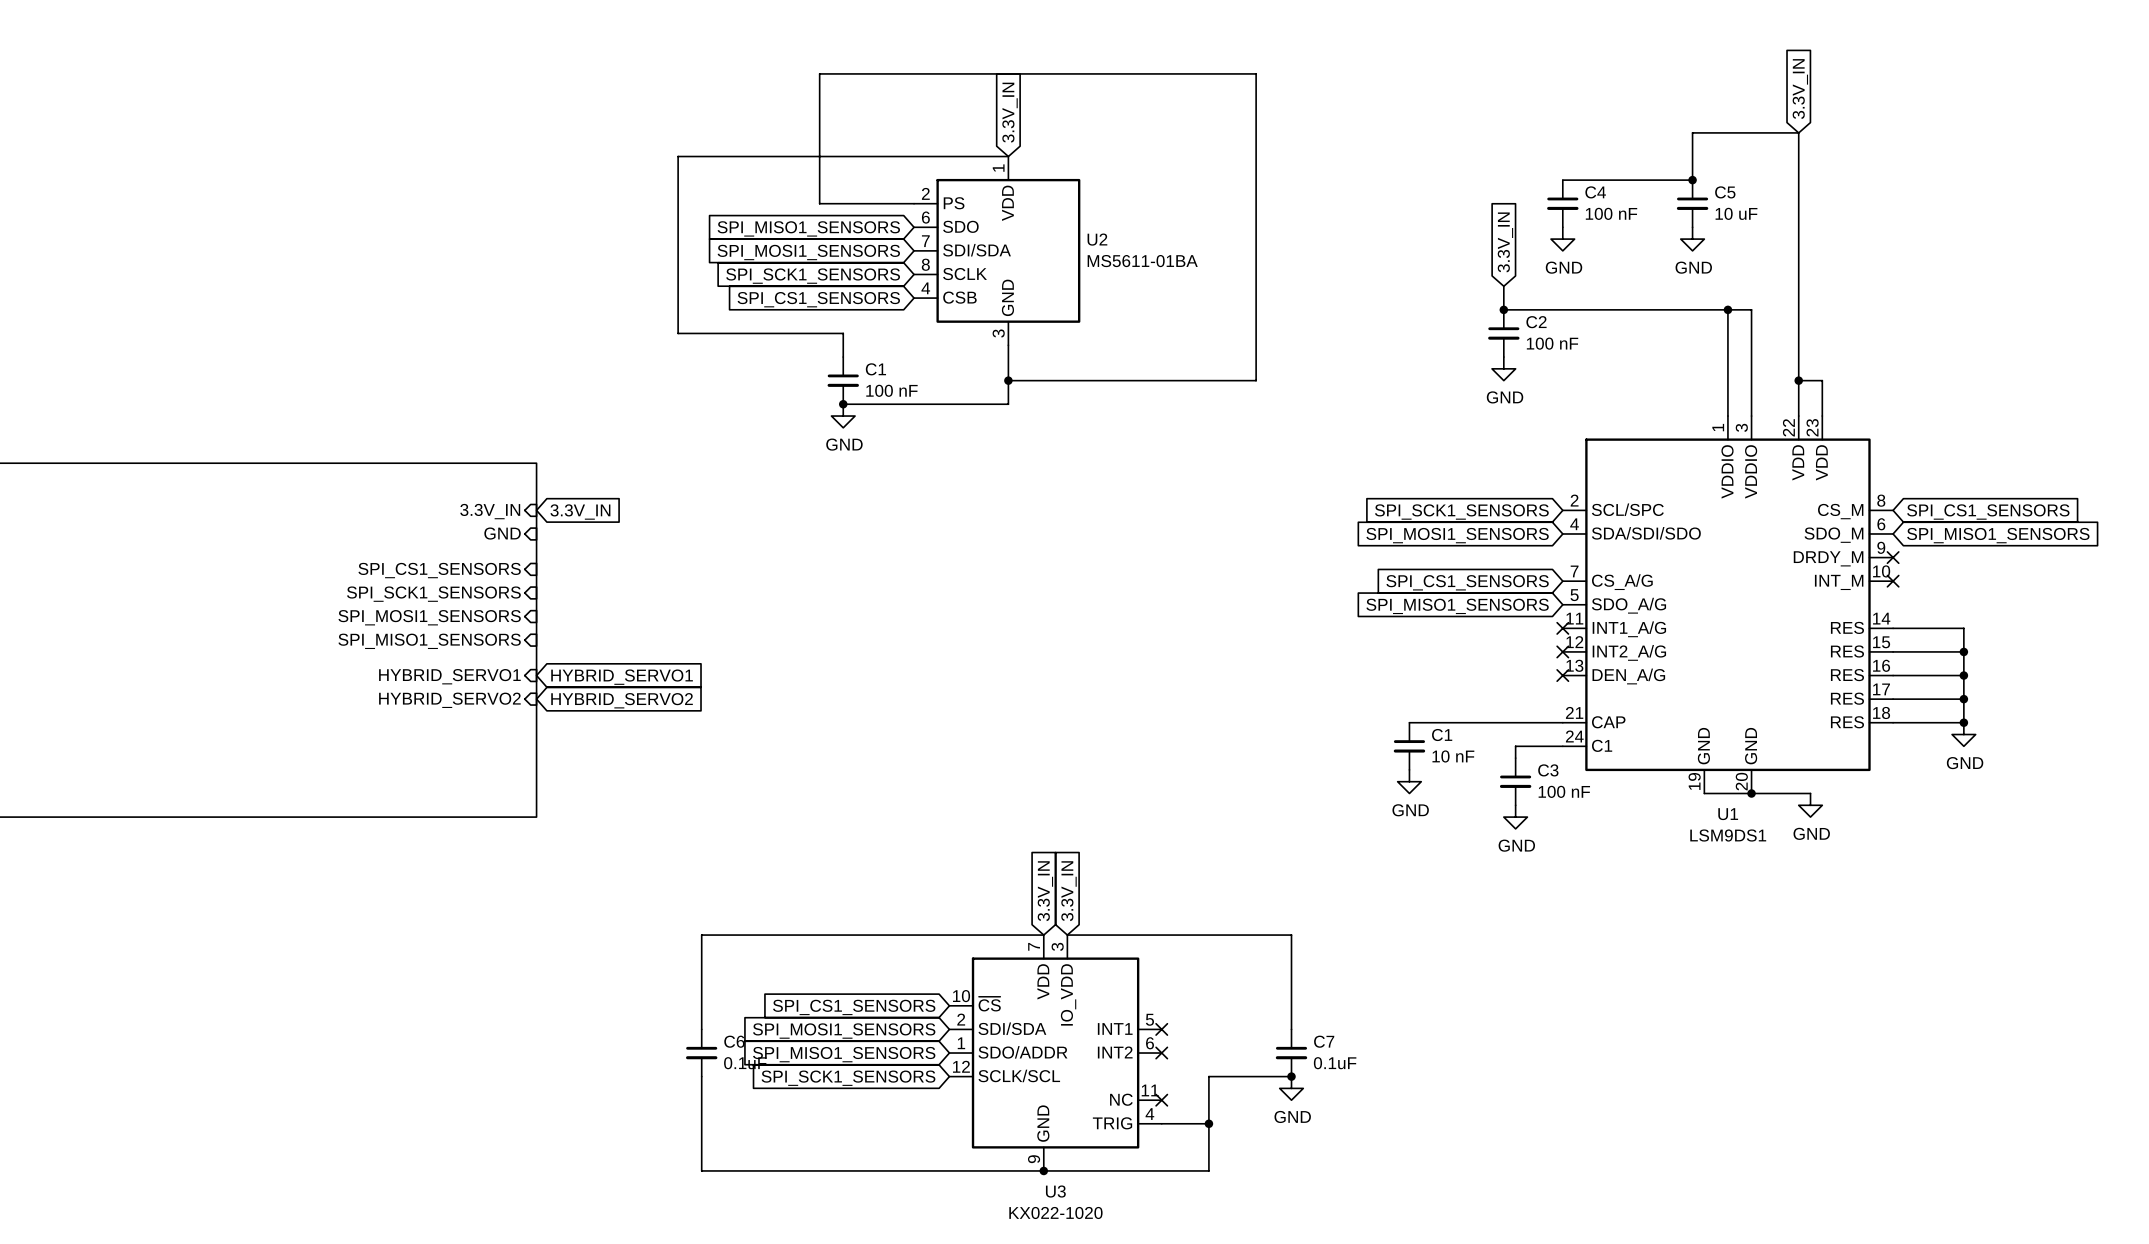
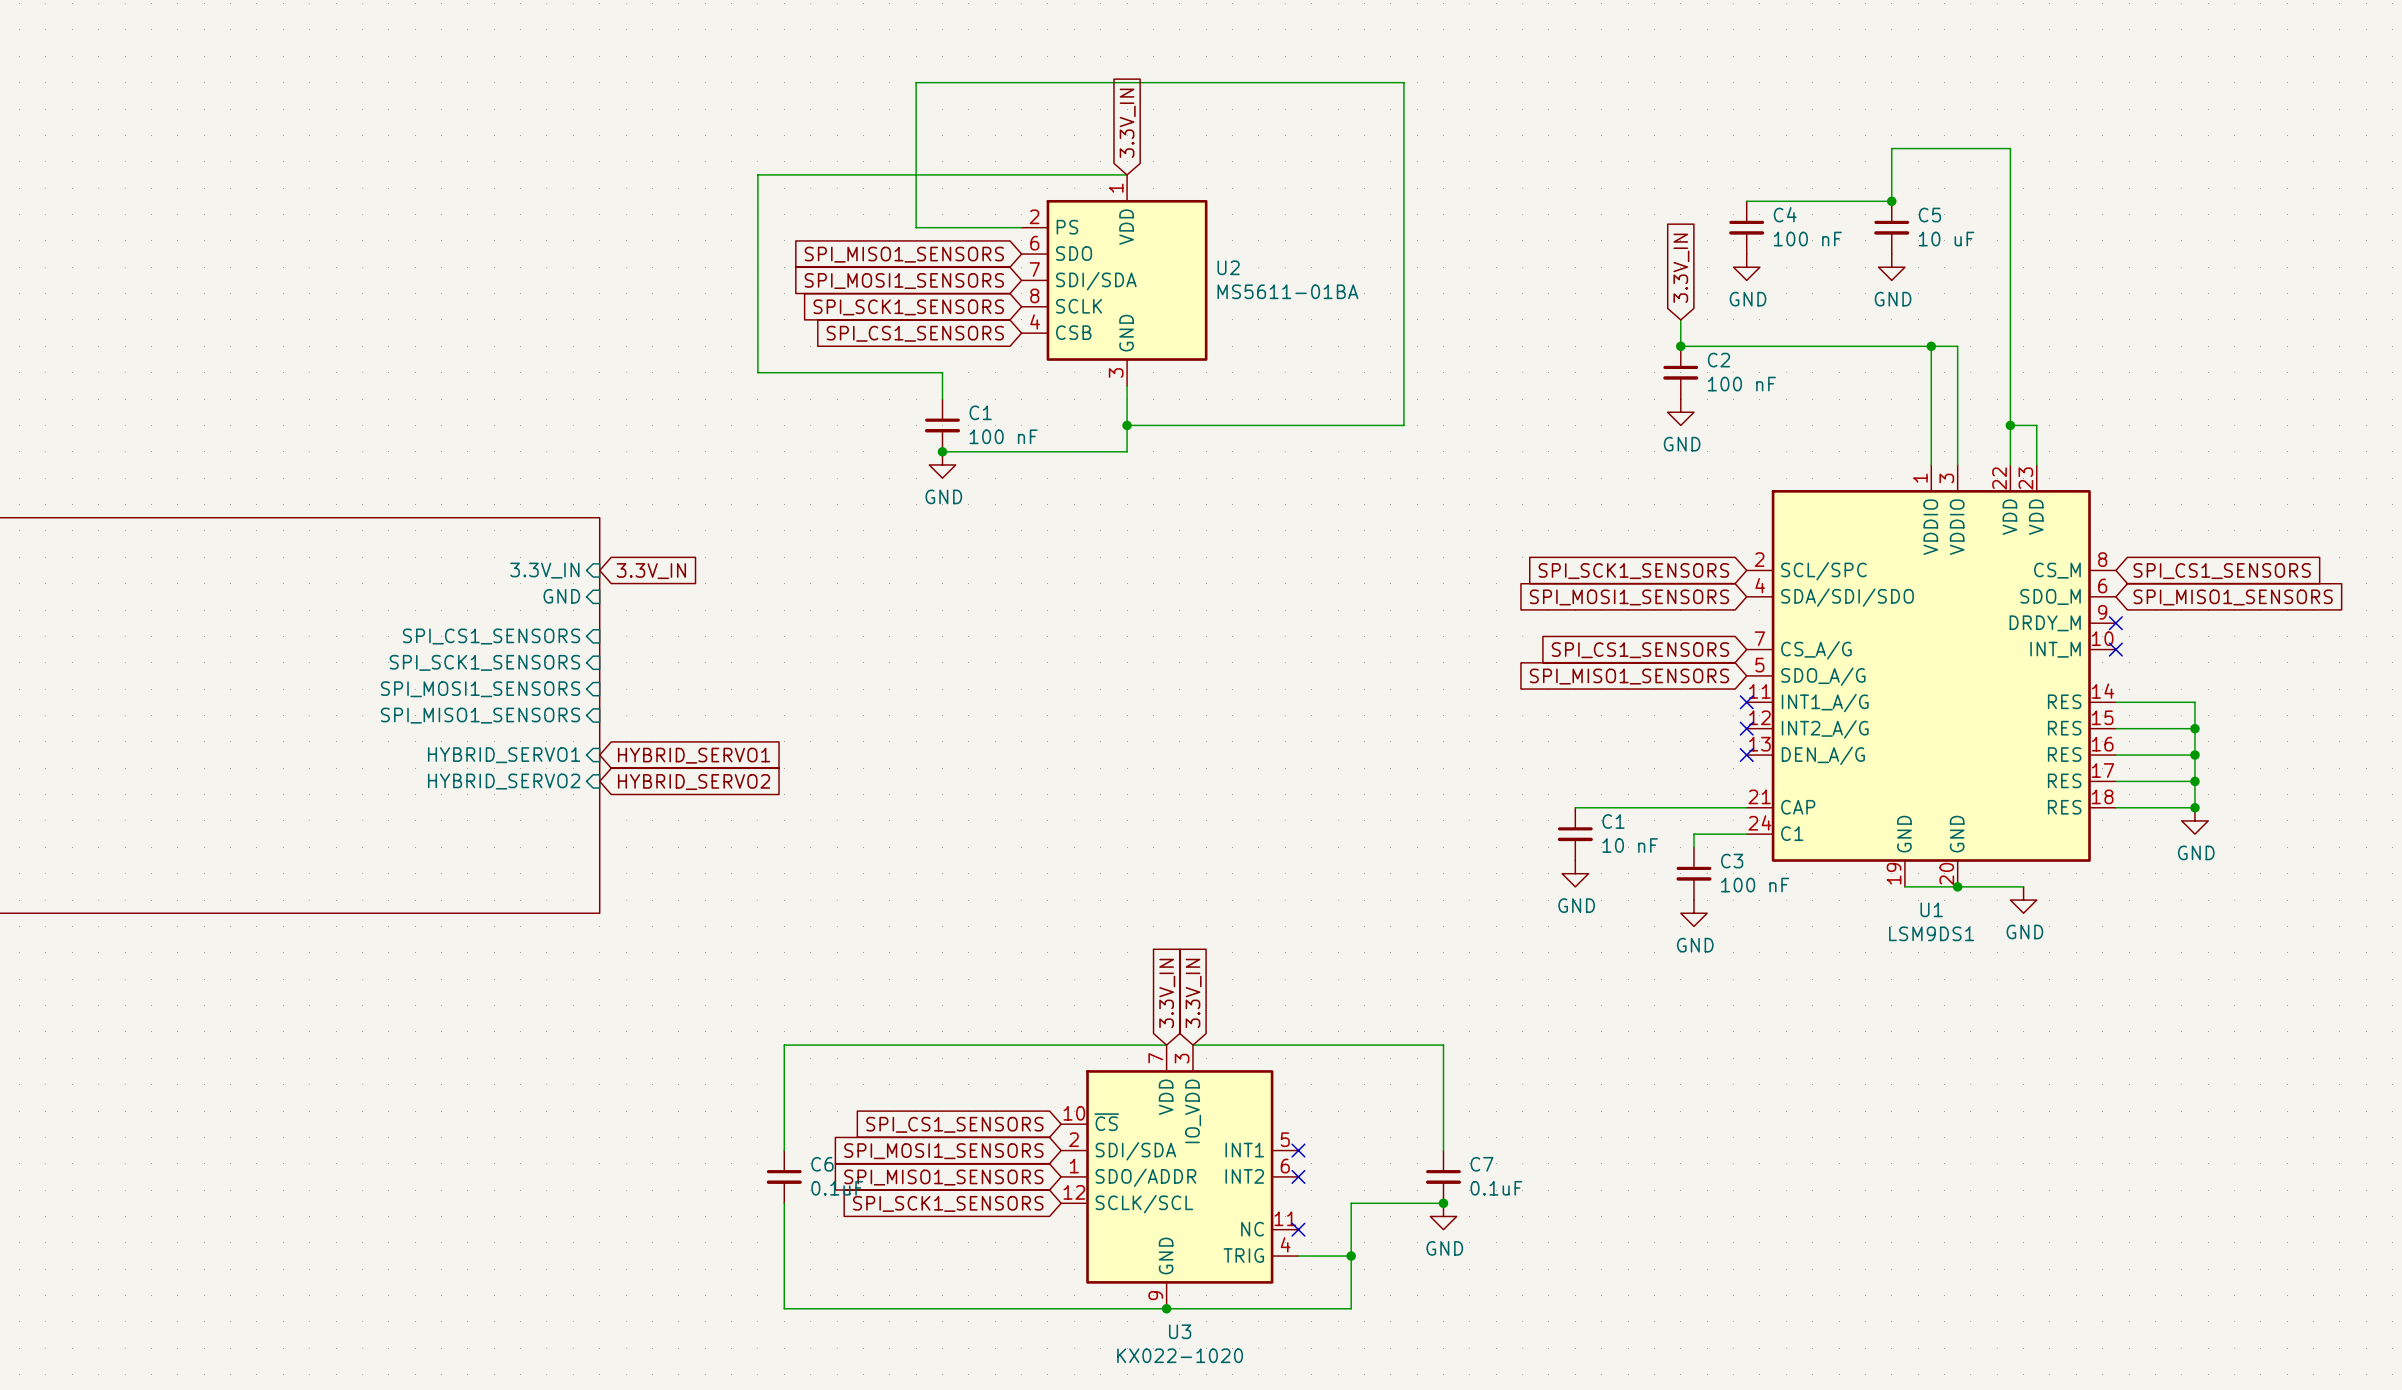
global label: 3.3V_IN (1800, 89) -> none

